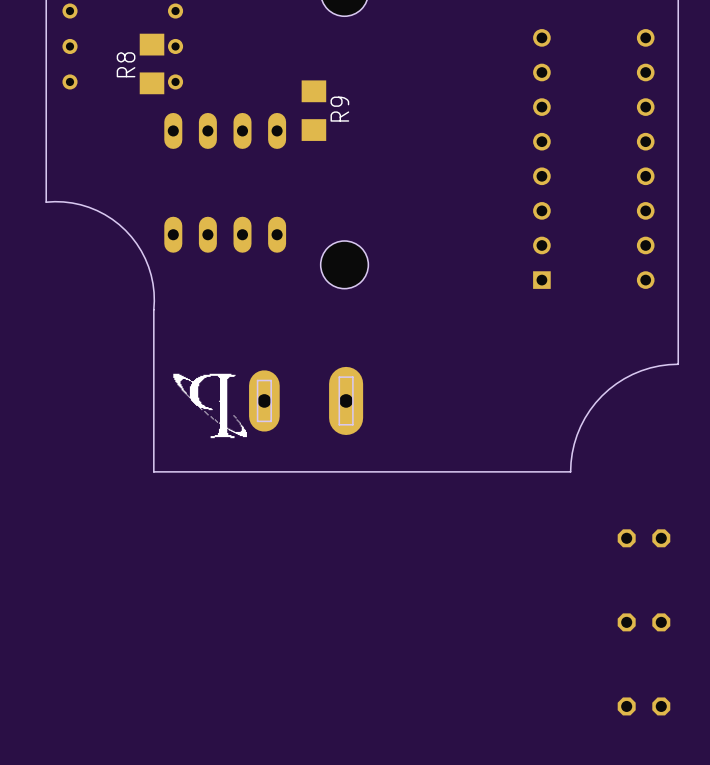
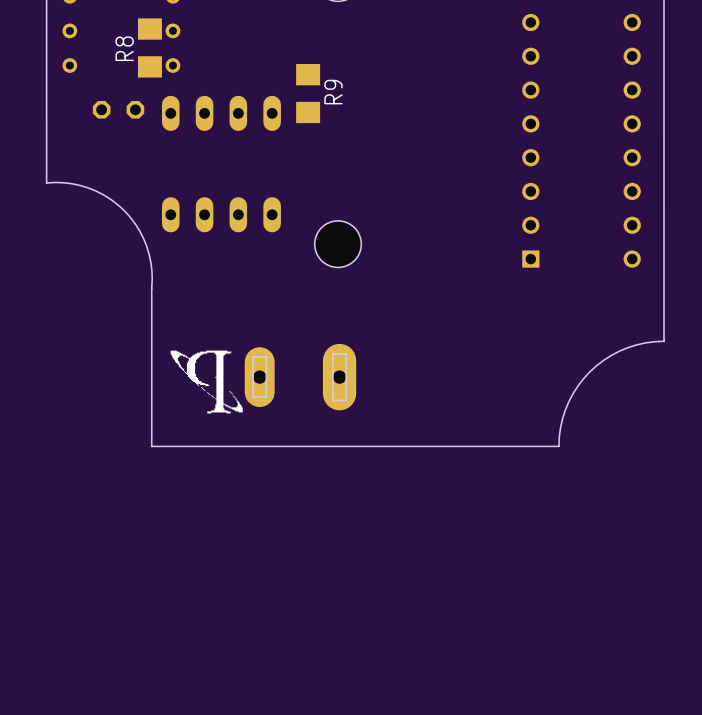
part: none -> (118, 109)
part: (643, 538) -> none
part: (643, 622) -> none
part: (643, 706) -> none

